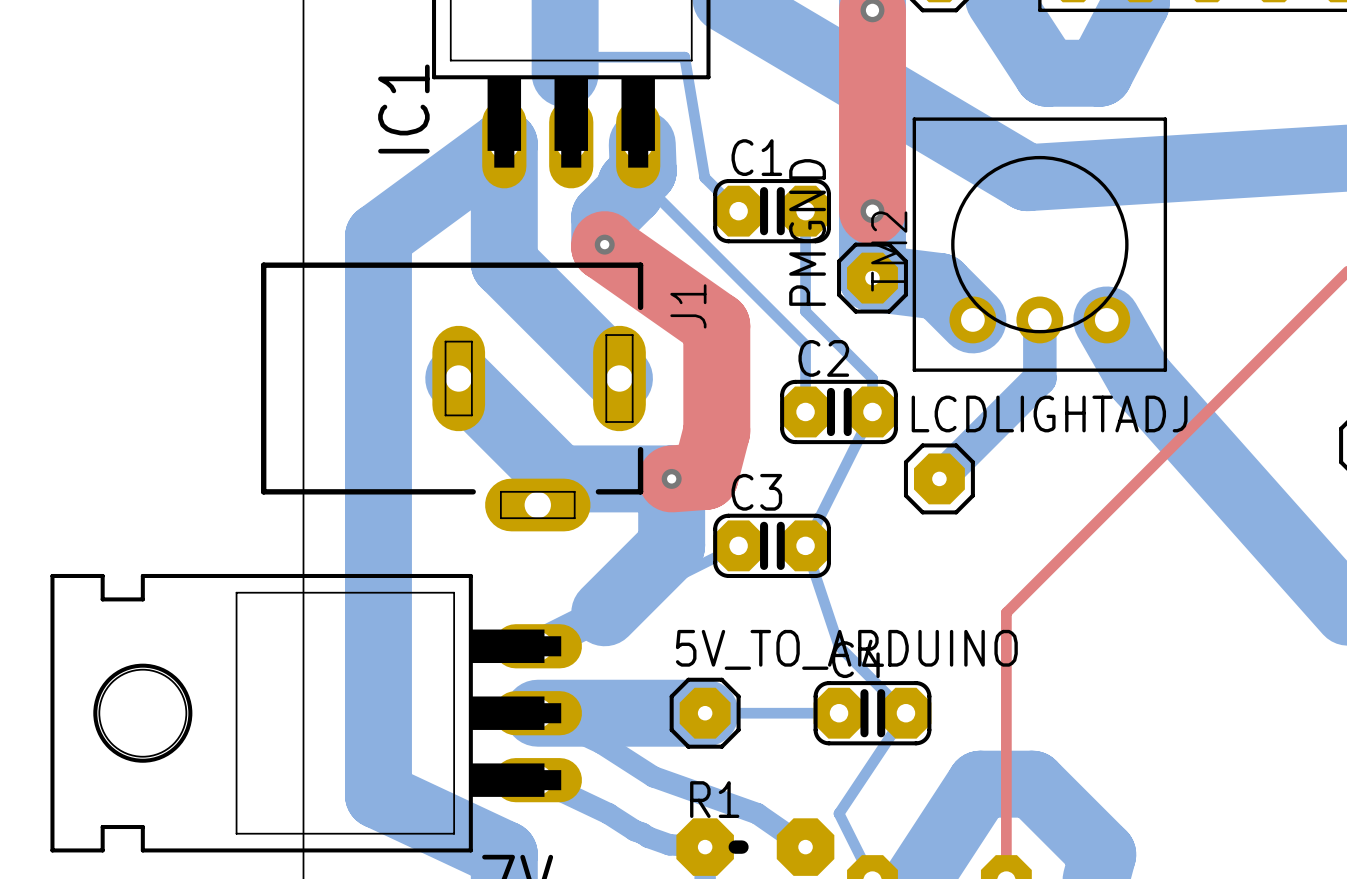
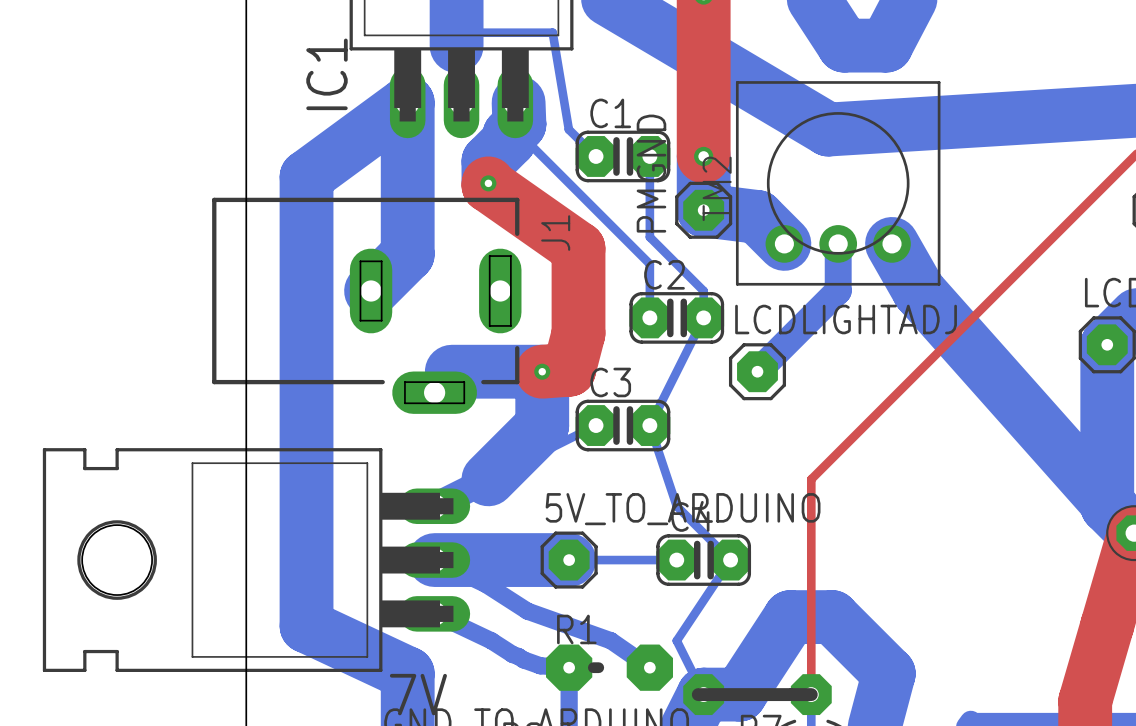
bottom track: (504, 263) (619, 378) -> (407, 198) (407, 254) (371, 291)
bottom track: (458, 378) (559, 478) -> none

